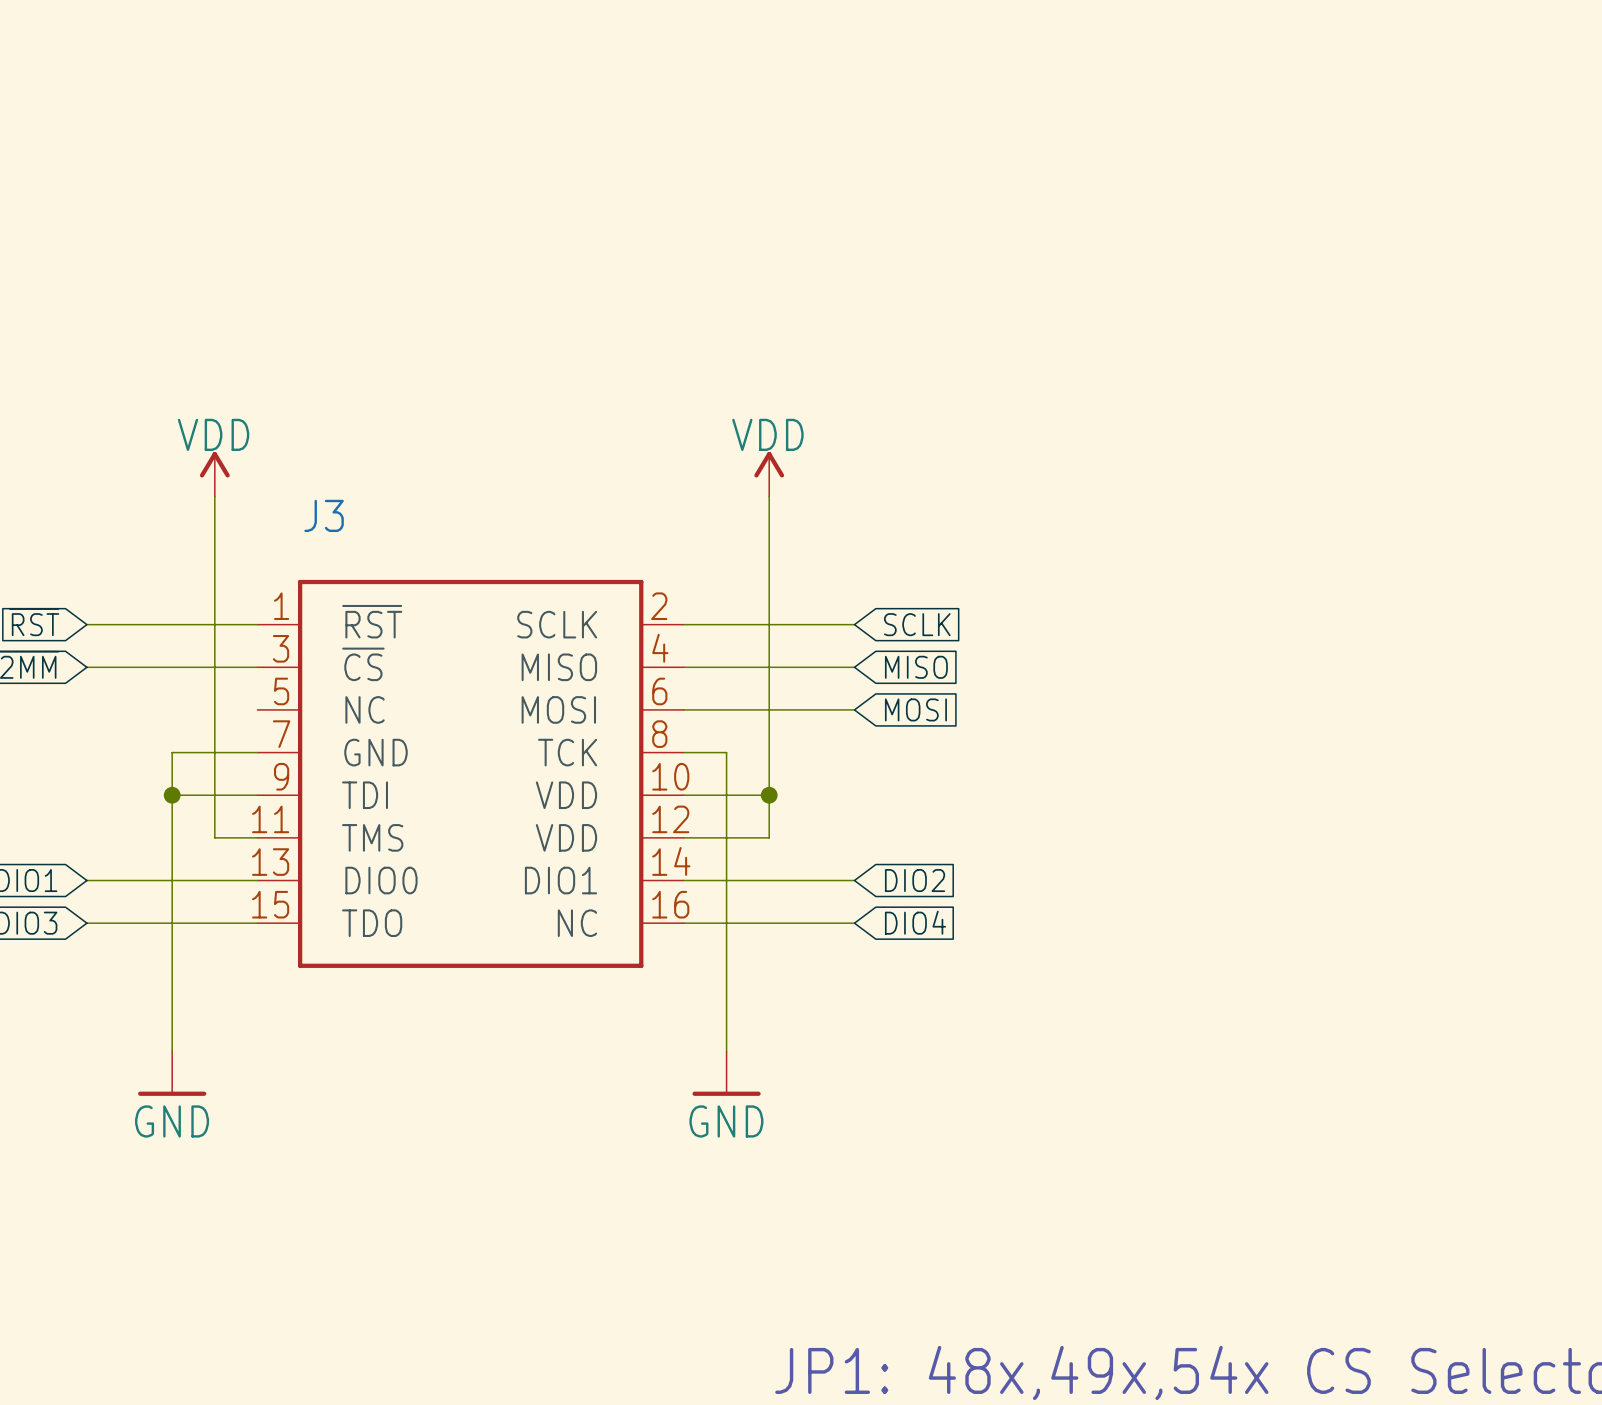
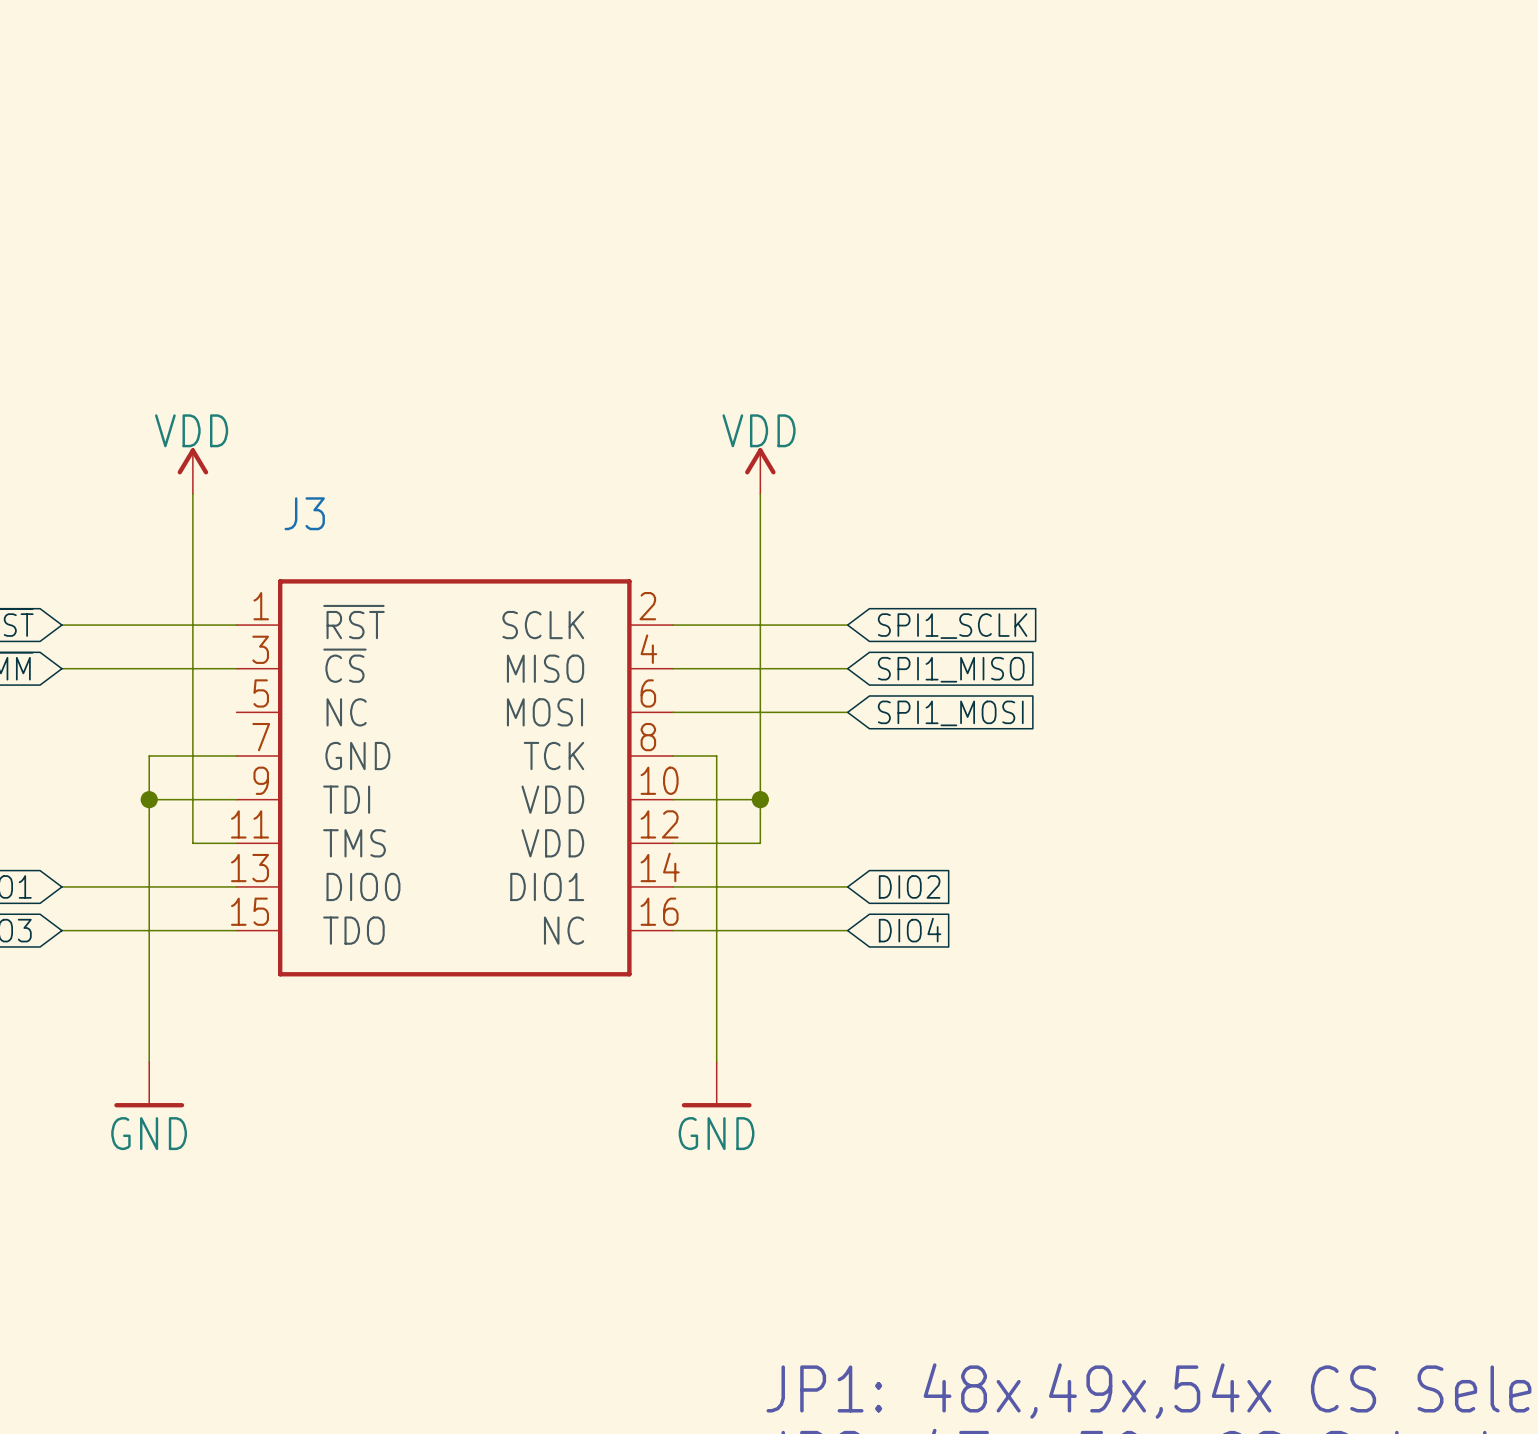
global label: SCLK (917, 624) -> SPI1_SCLK (952, 626)
global label: MISO (916, 667) -> SPI1_MISO (951, 669)
global label: MOSI (915, 709) -> SPI1_MOSI (950, 713)

